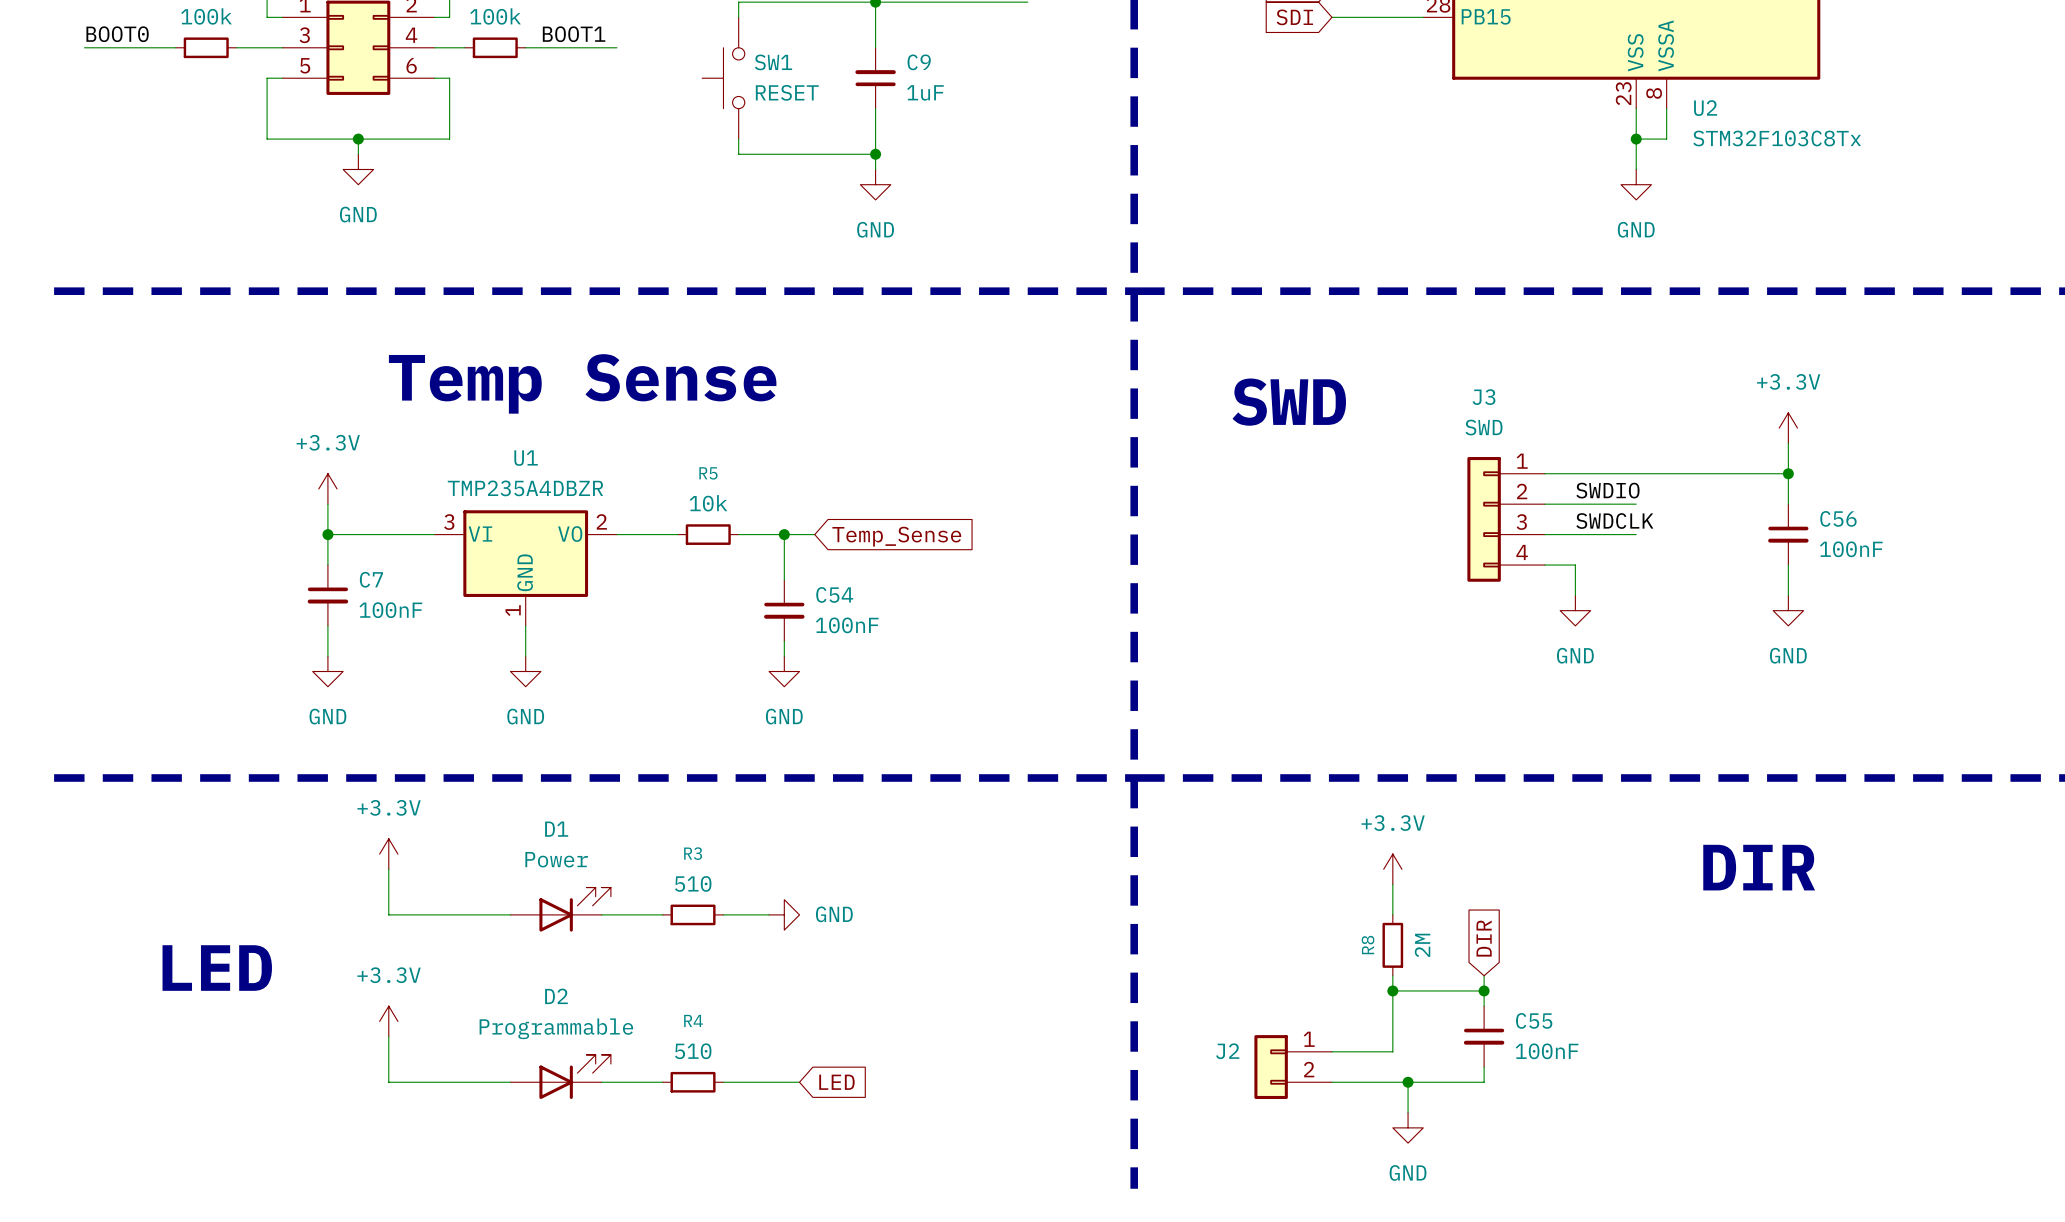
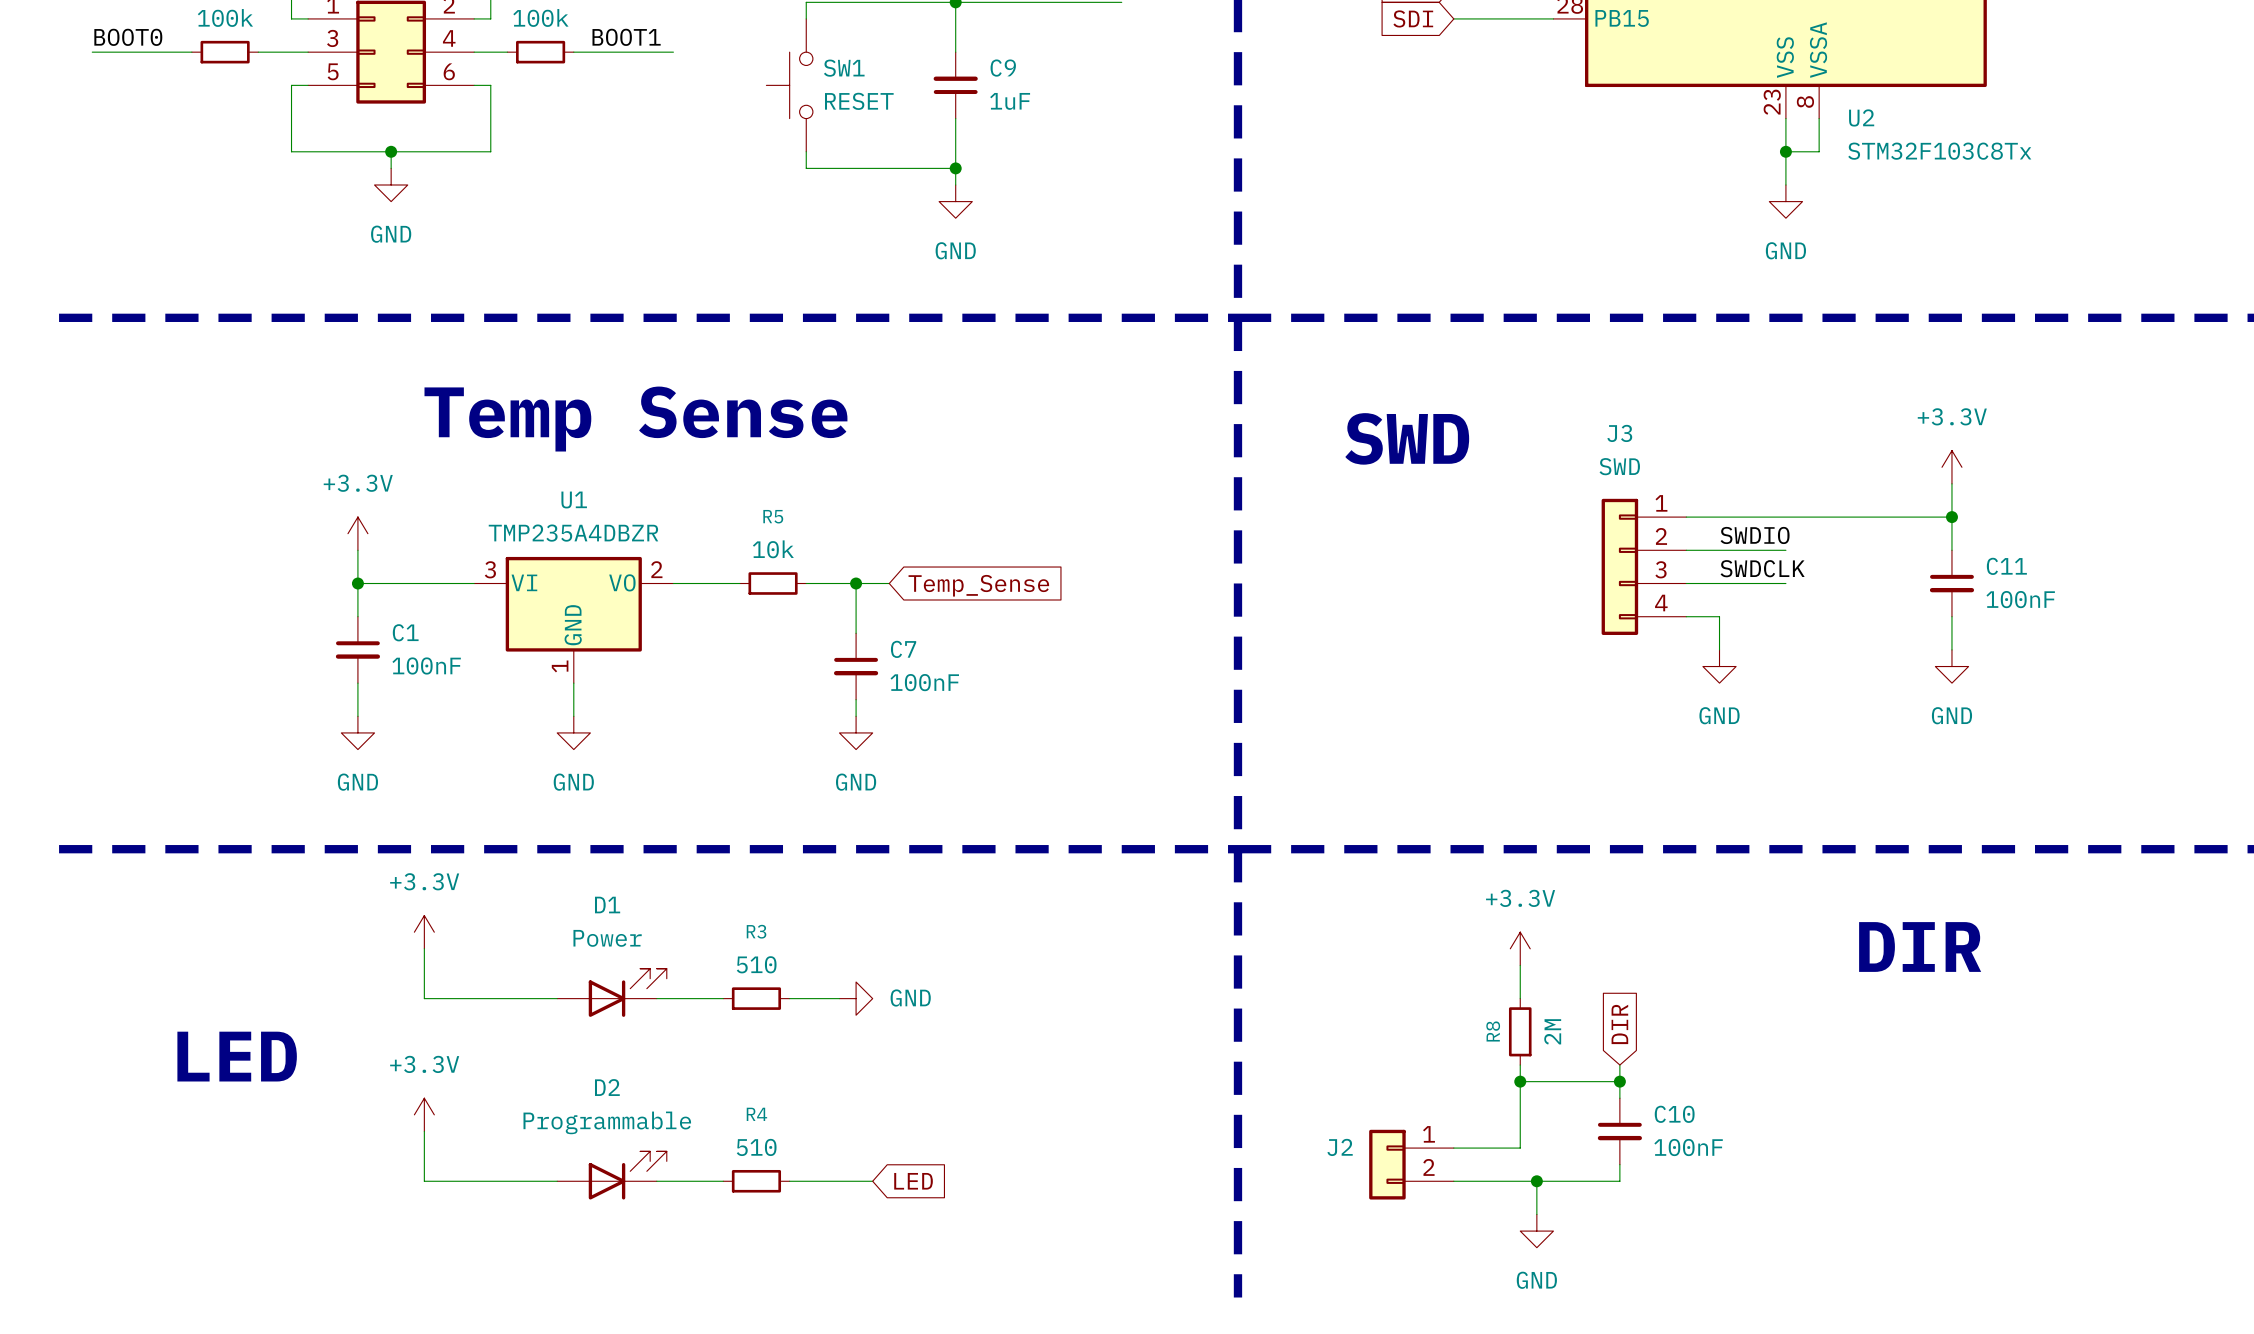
C56 name: C56 (1838, 518) -> C11 (2006, 566)
C7 name: C7 (371, 579) -> C1 (405, 632)
C54 name: C54 (834, 594) -> C7 (903, 649)
C55 name: C55 (1534, 1020) -> C10 (1674, 1114)

